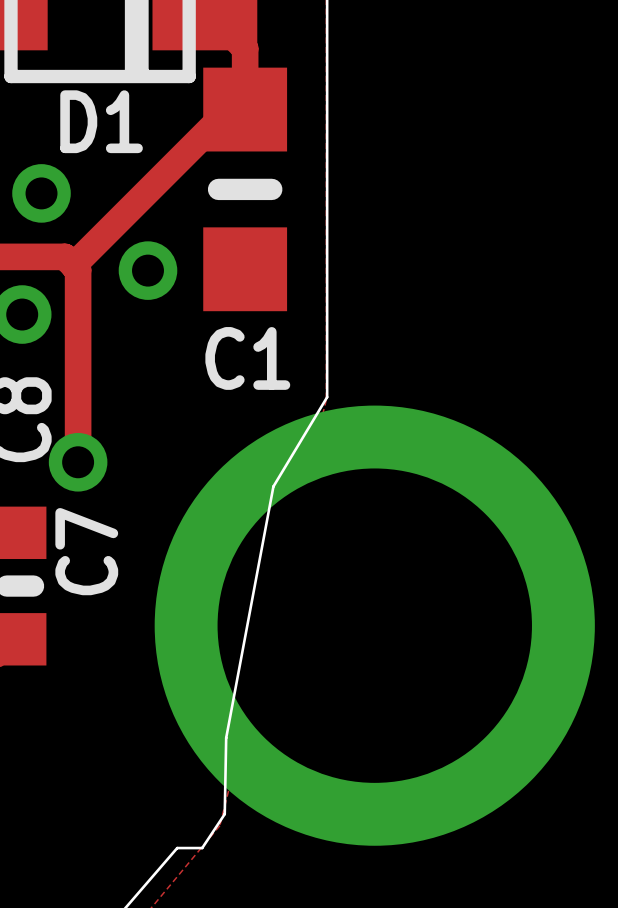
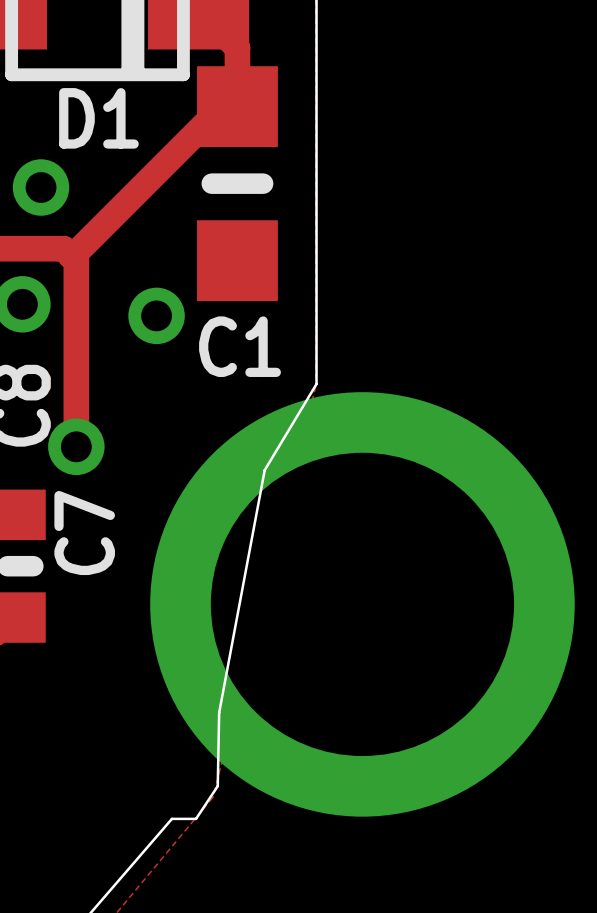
via position: (147, 270) -> (156, 315)

